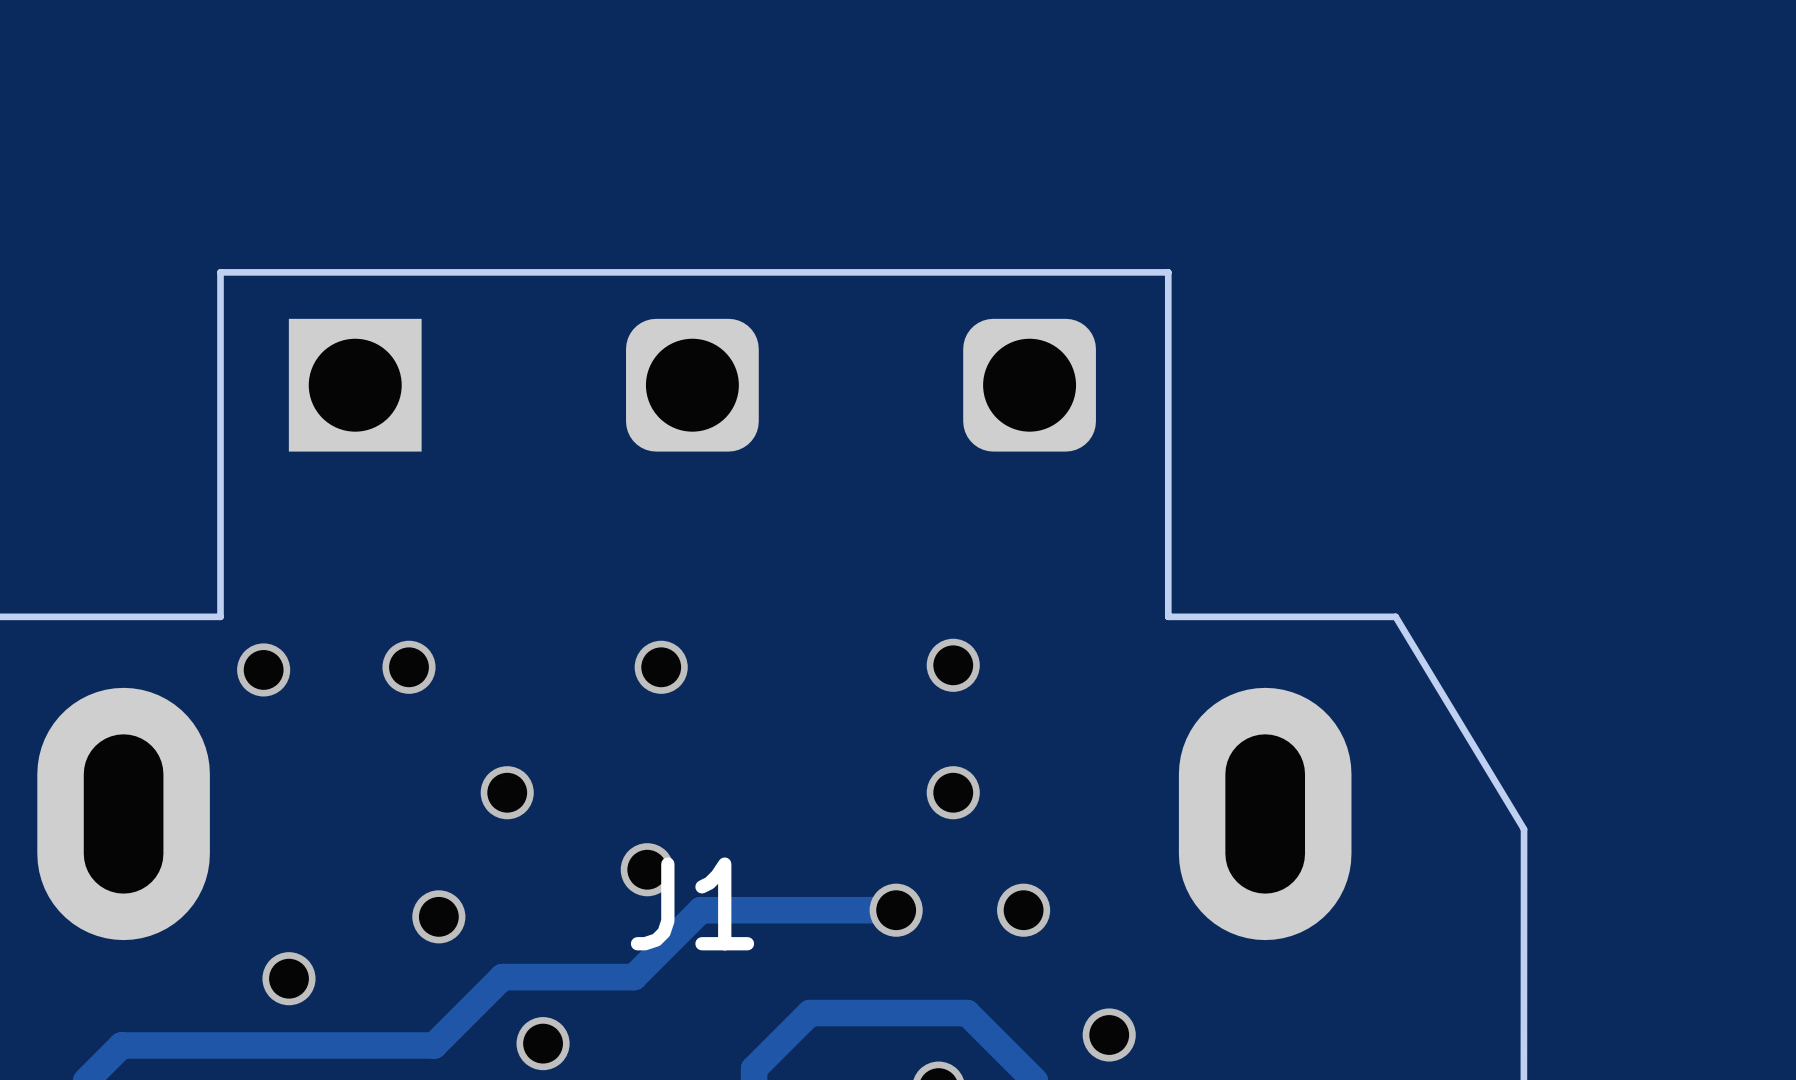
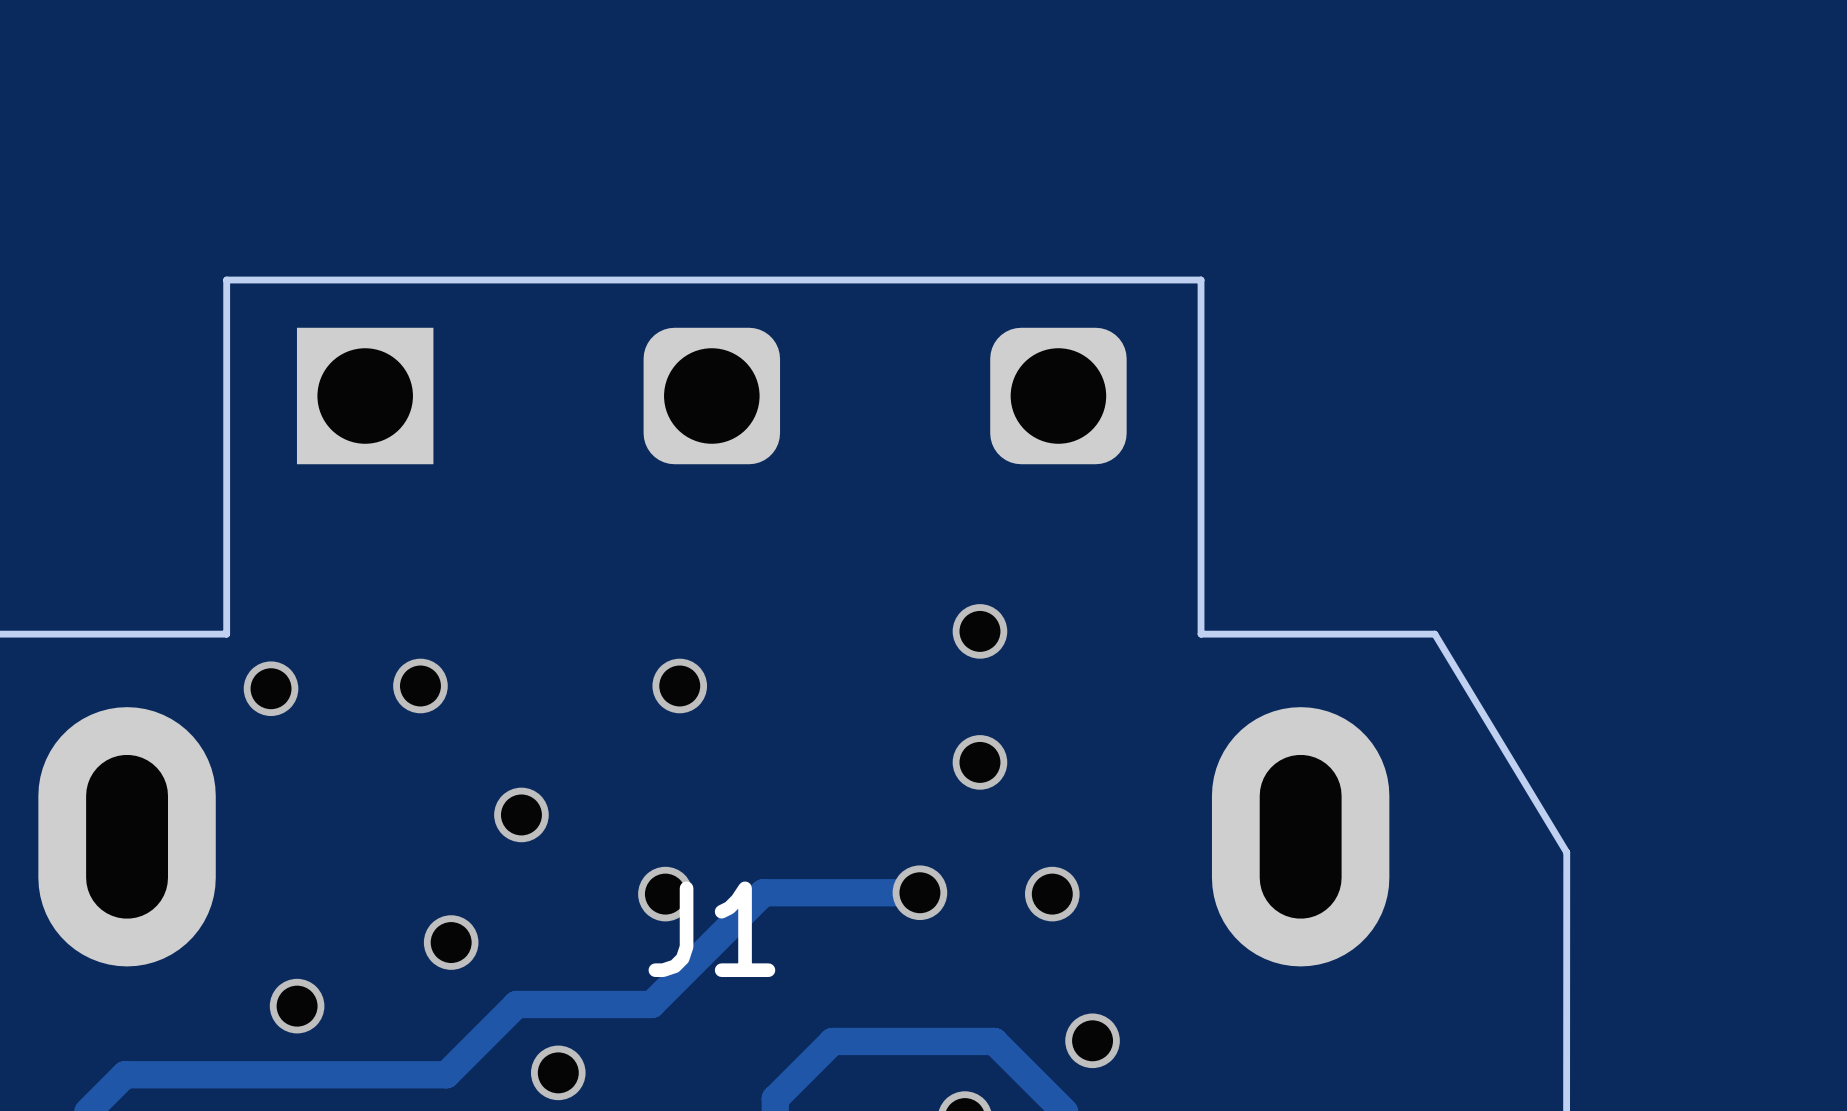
via position: (953, 665) -> (979, 631)
via position: (953, 792) -> (979, 762)
track: (700, 910) (896, 910) -> (720, 935) (763, 892) (919, 892)
via position: (896, 910) -> (919, 892)
via position: (1023, 910) -> (1052, 894)
via position: (1109, 1034) -> (1092, 1040)

